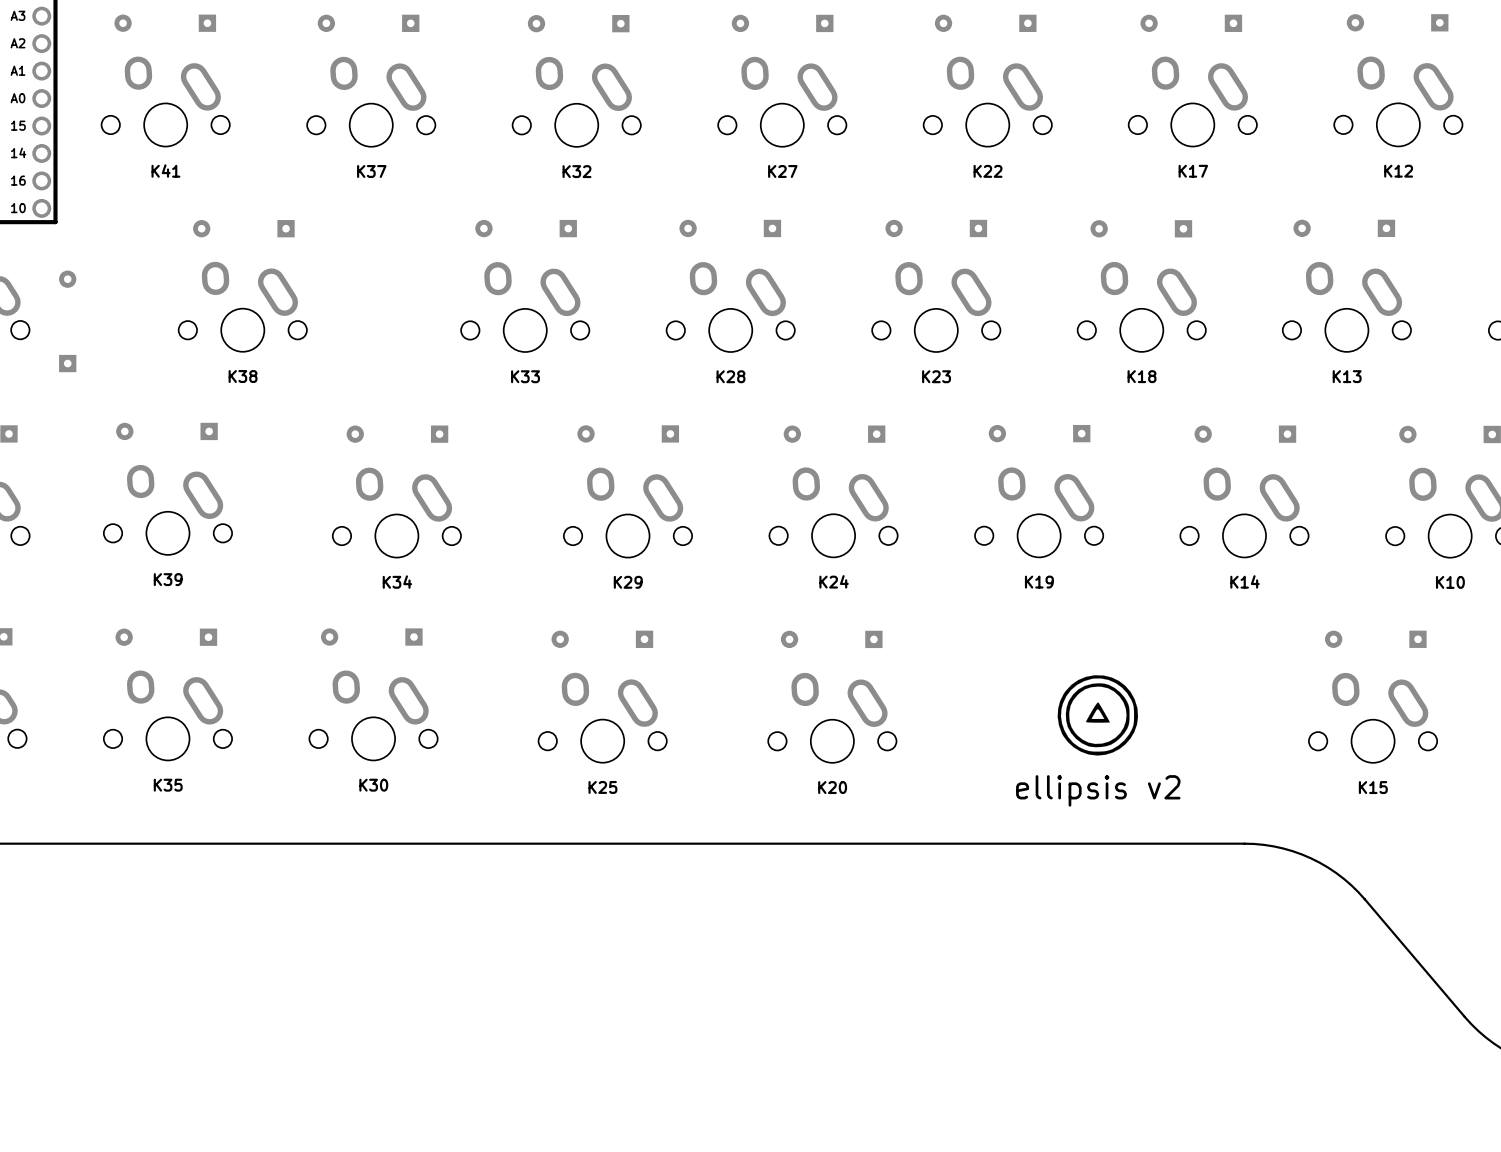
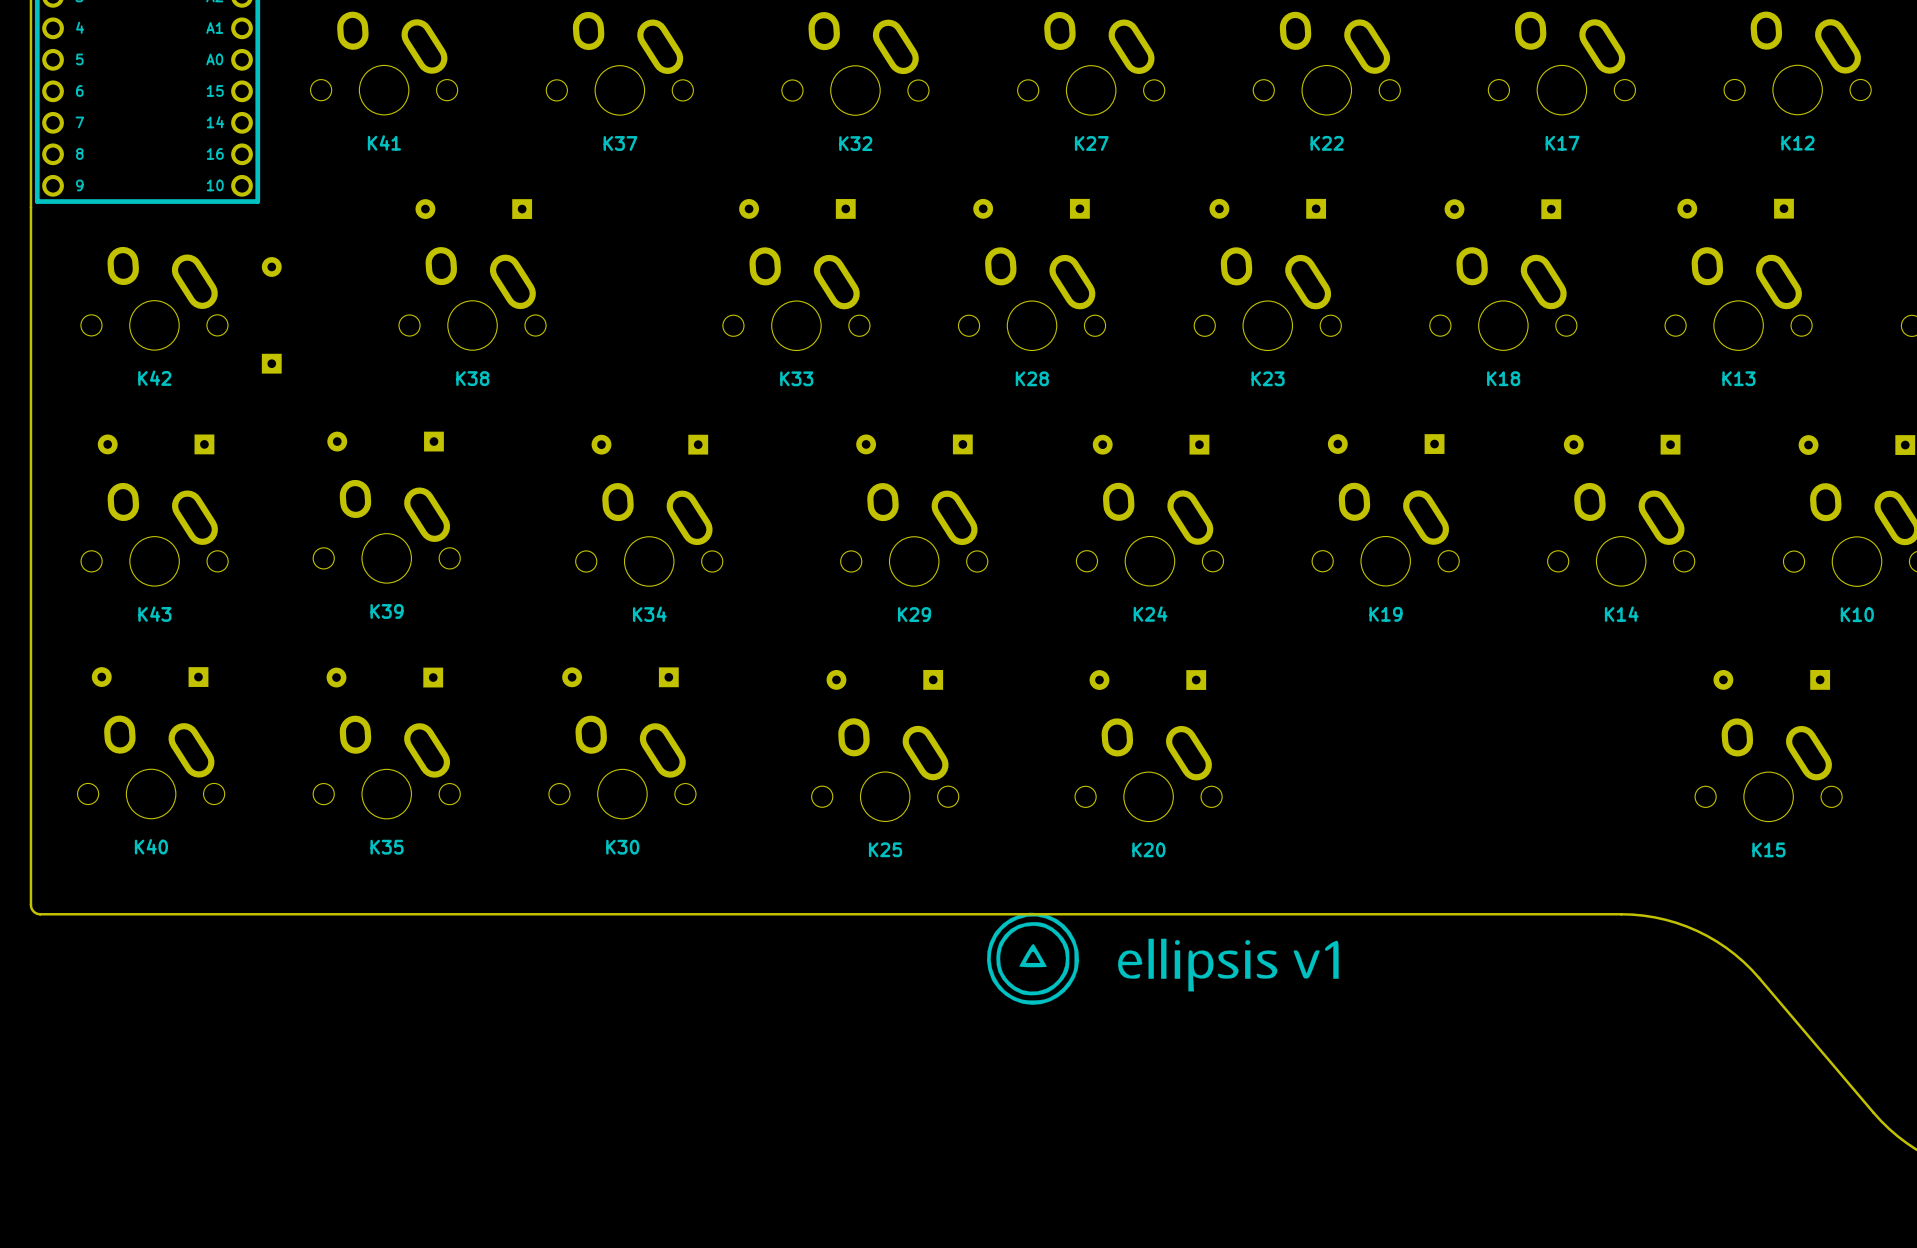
drawing: [1057, 675, 1139, 756] -> none
drawing: none -> [986, 912, 1339, 1005]

